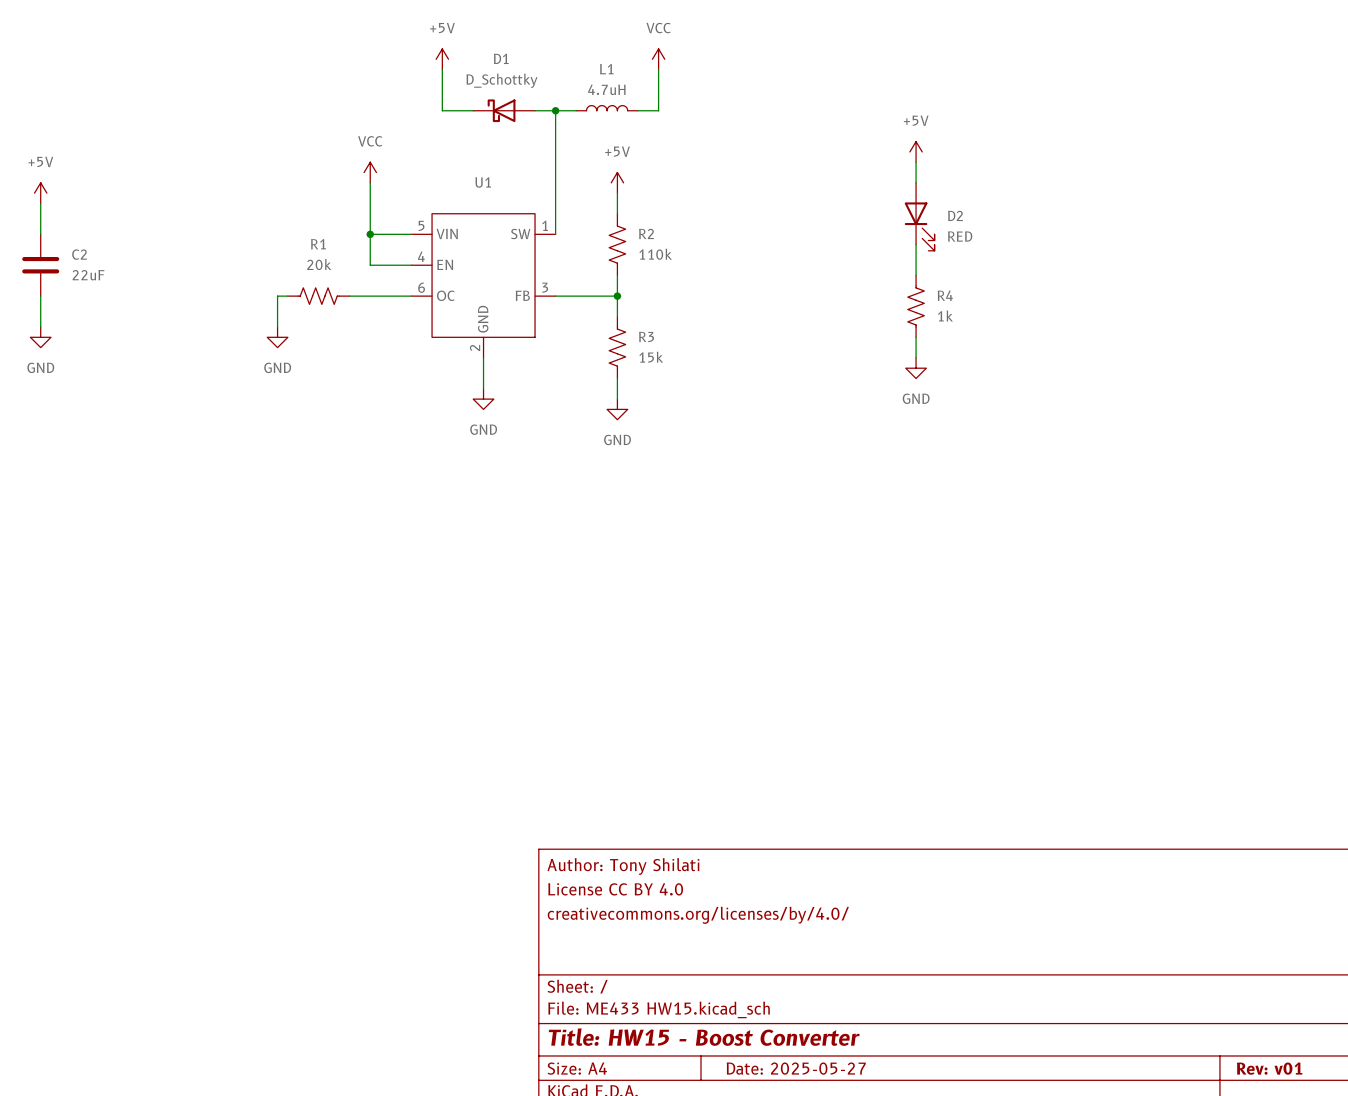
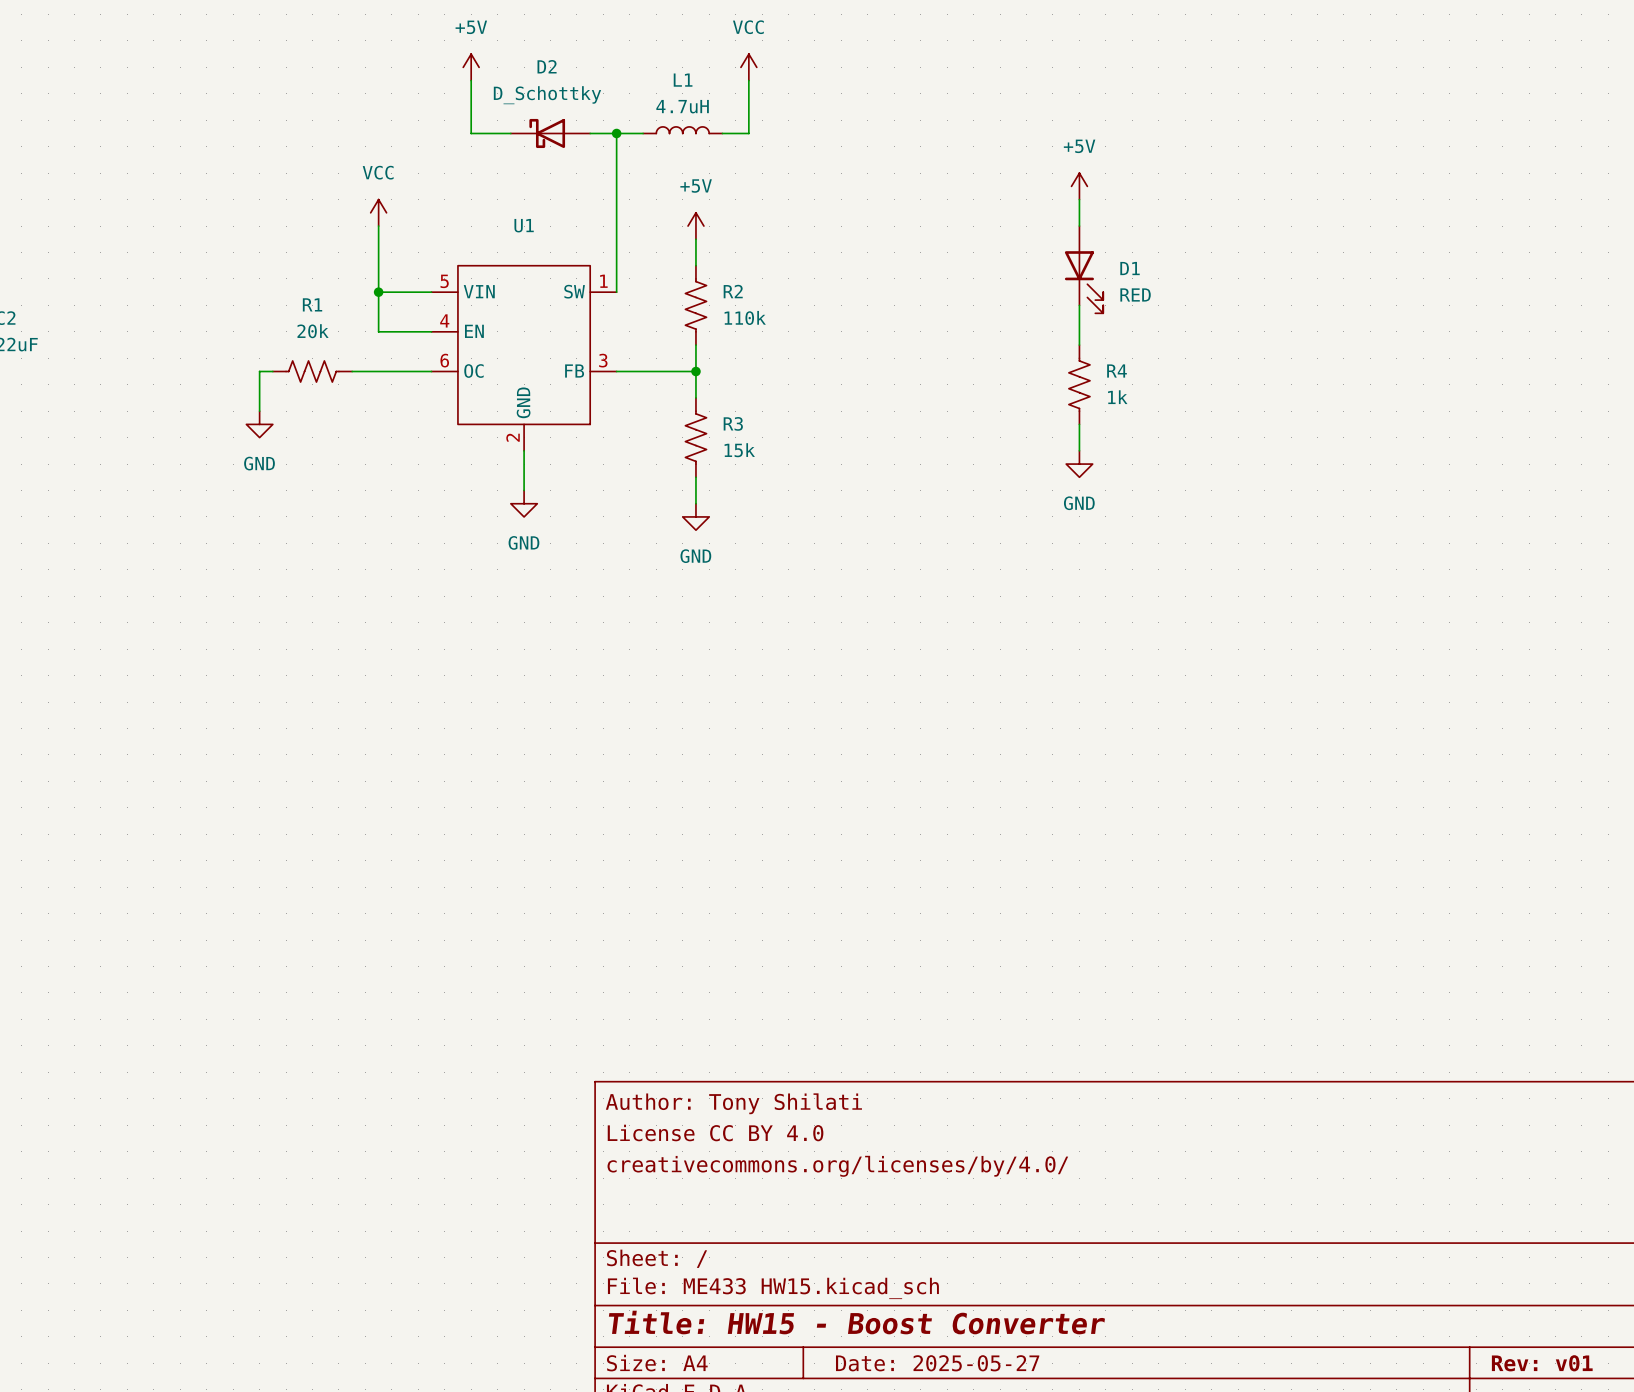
D1 name: D1 (501, 58) -> D2 (547, 66)
D2 name: D2 (955, 215) -> D1 (1130, 268)

